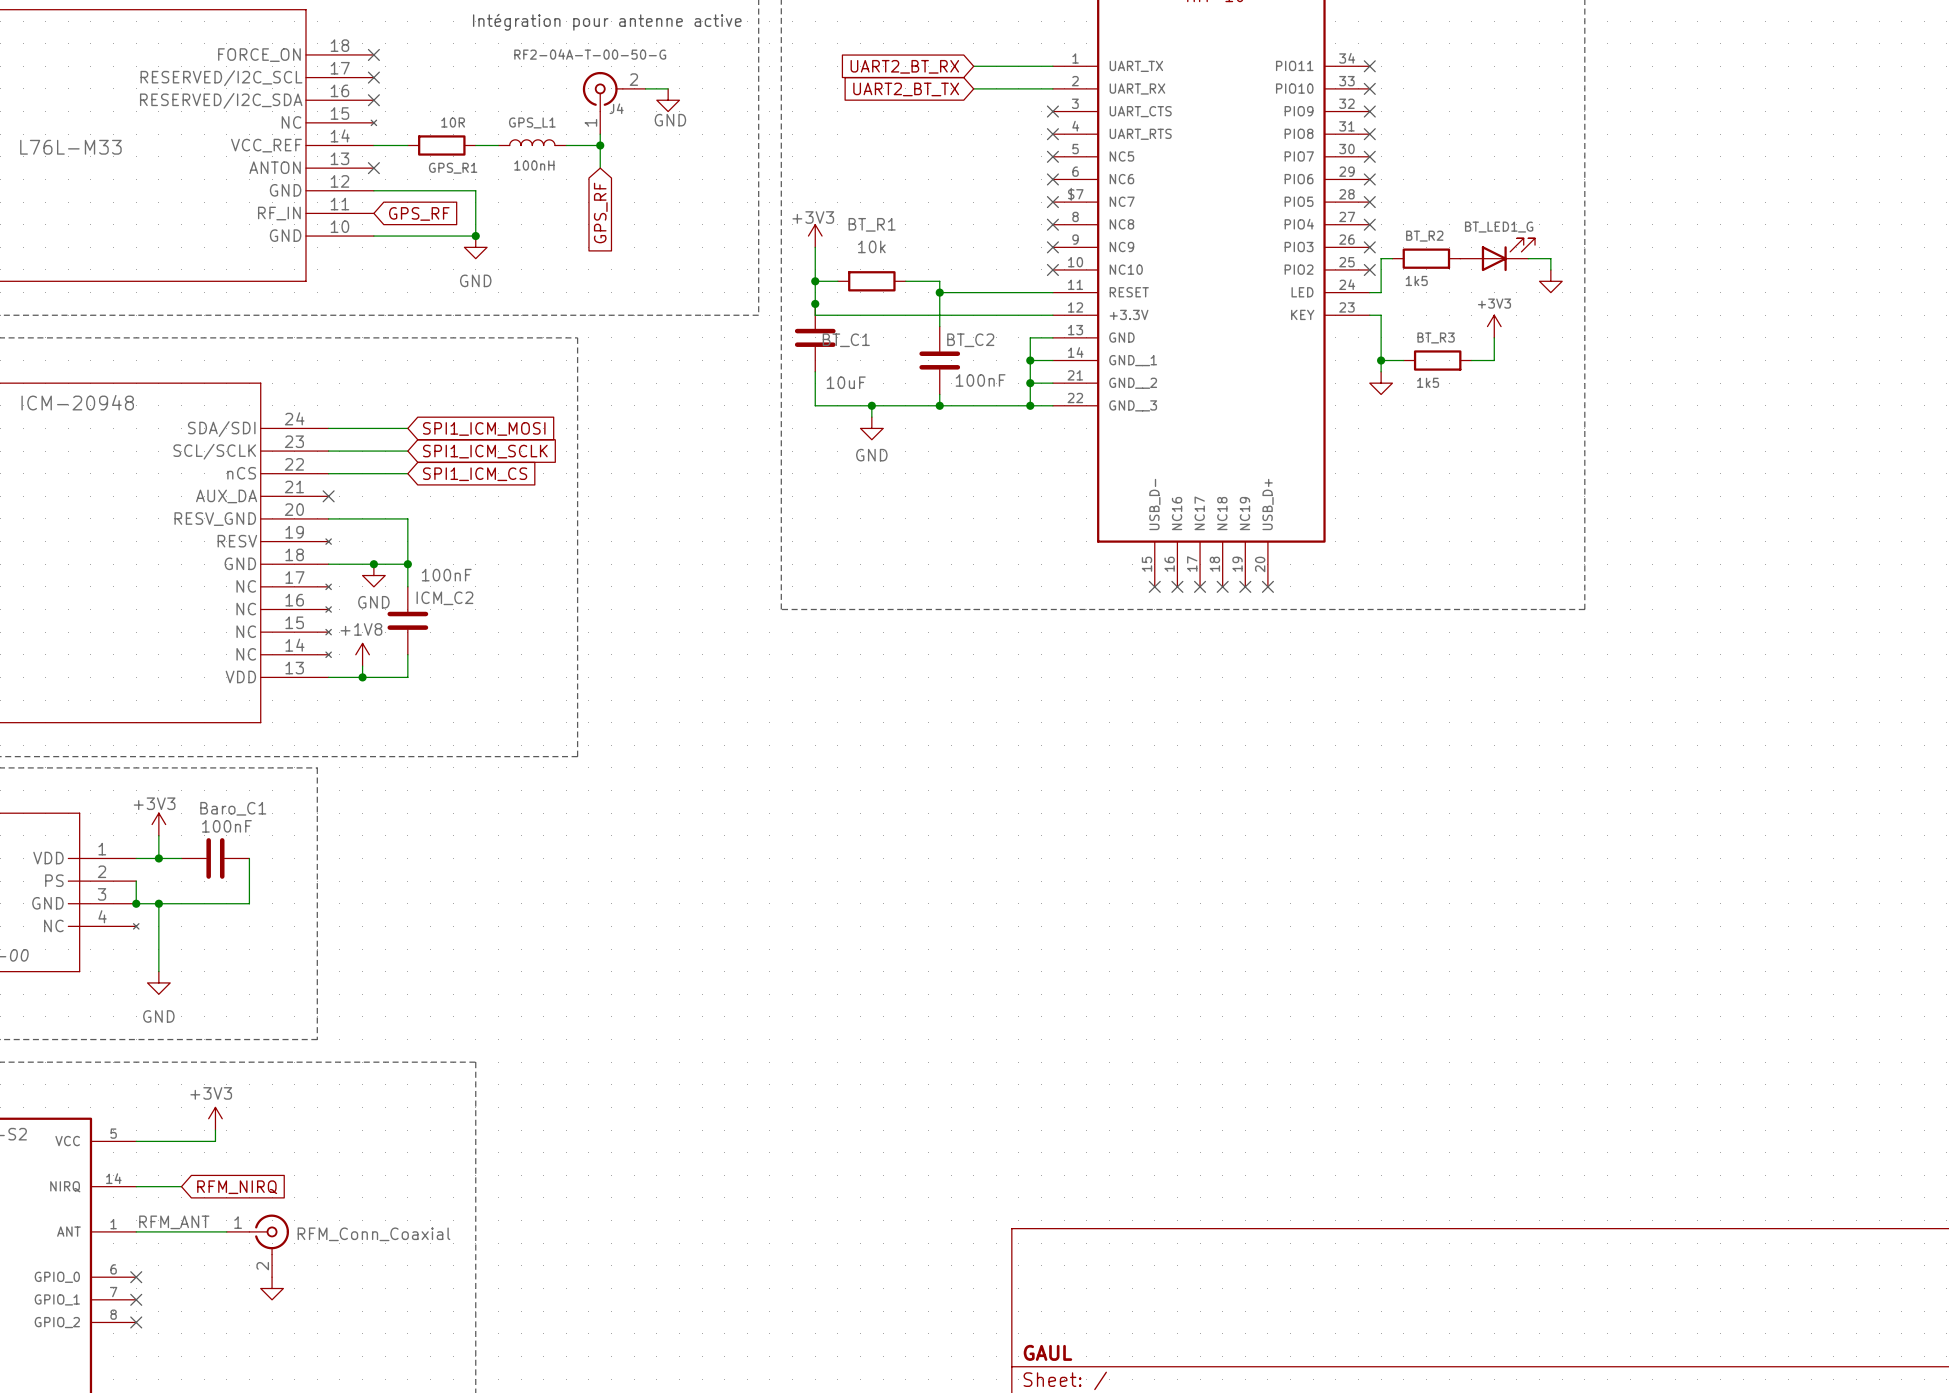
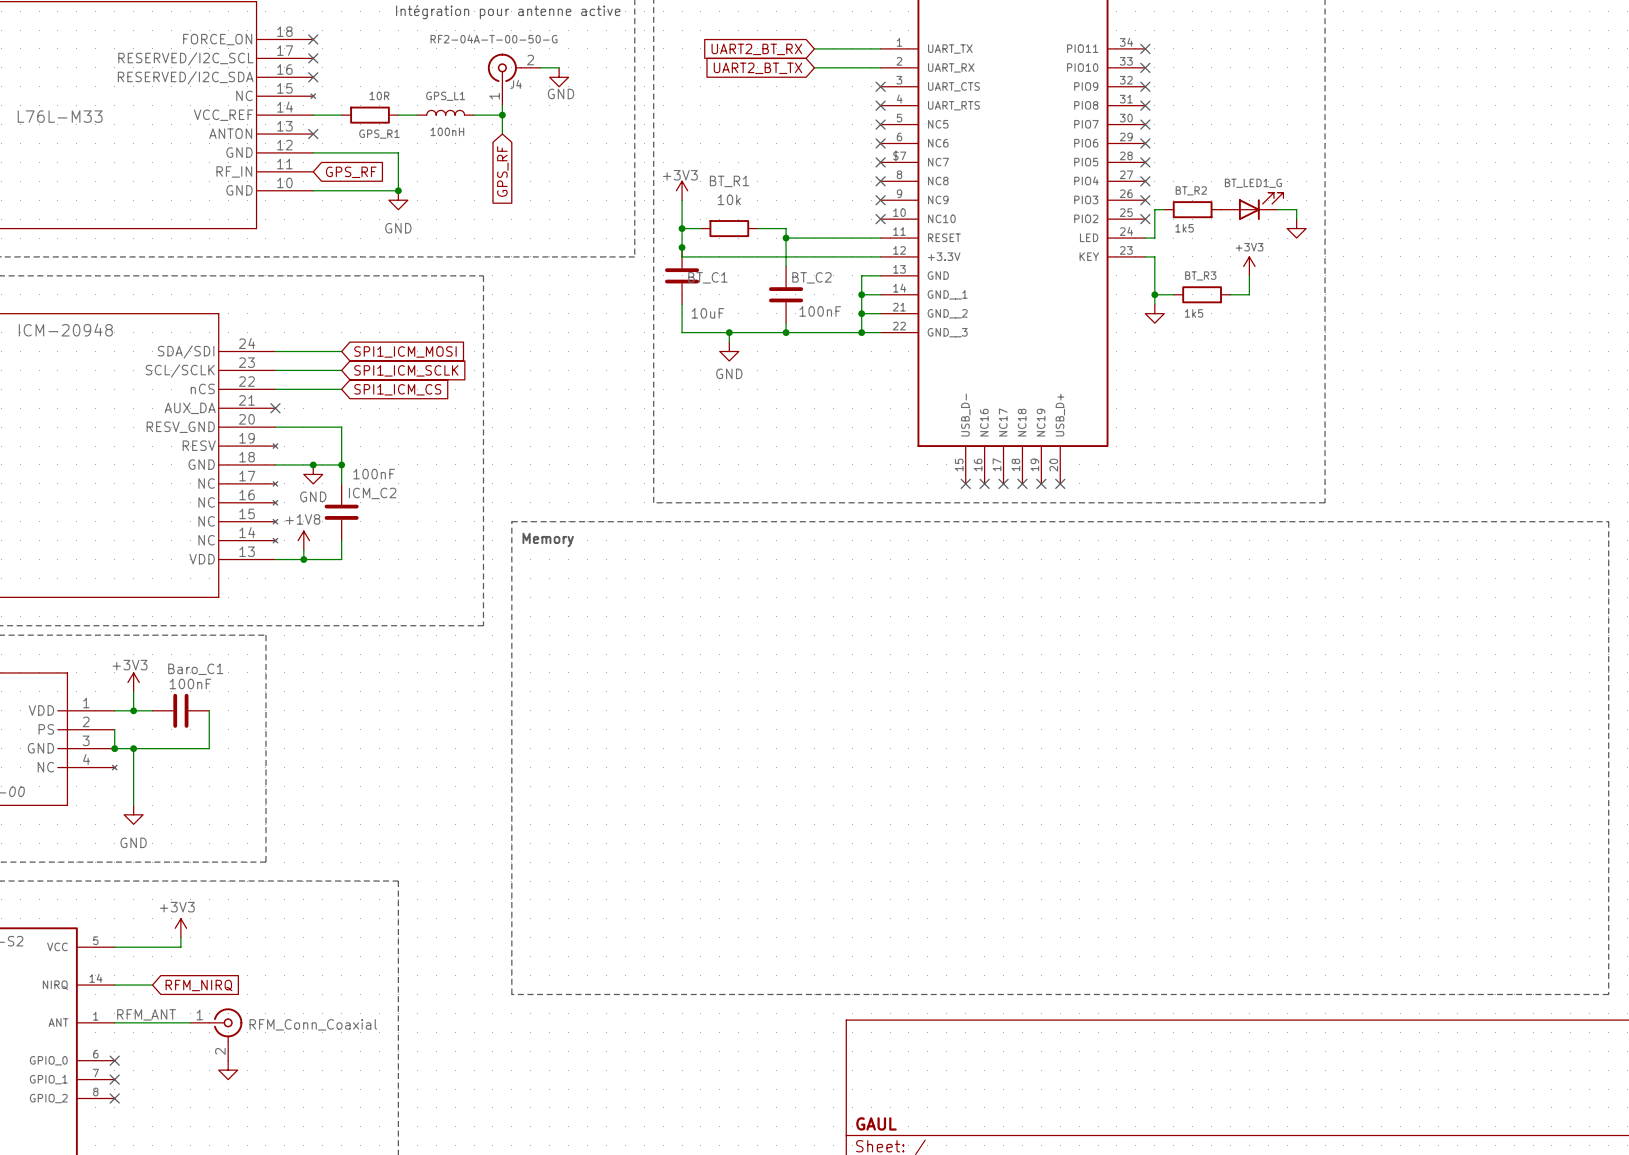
line: none -> (511, 521) (1608, 521) (1608, 994) (511, 994) (511, 521)
text: none -> Memory (548, 539)

